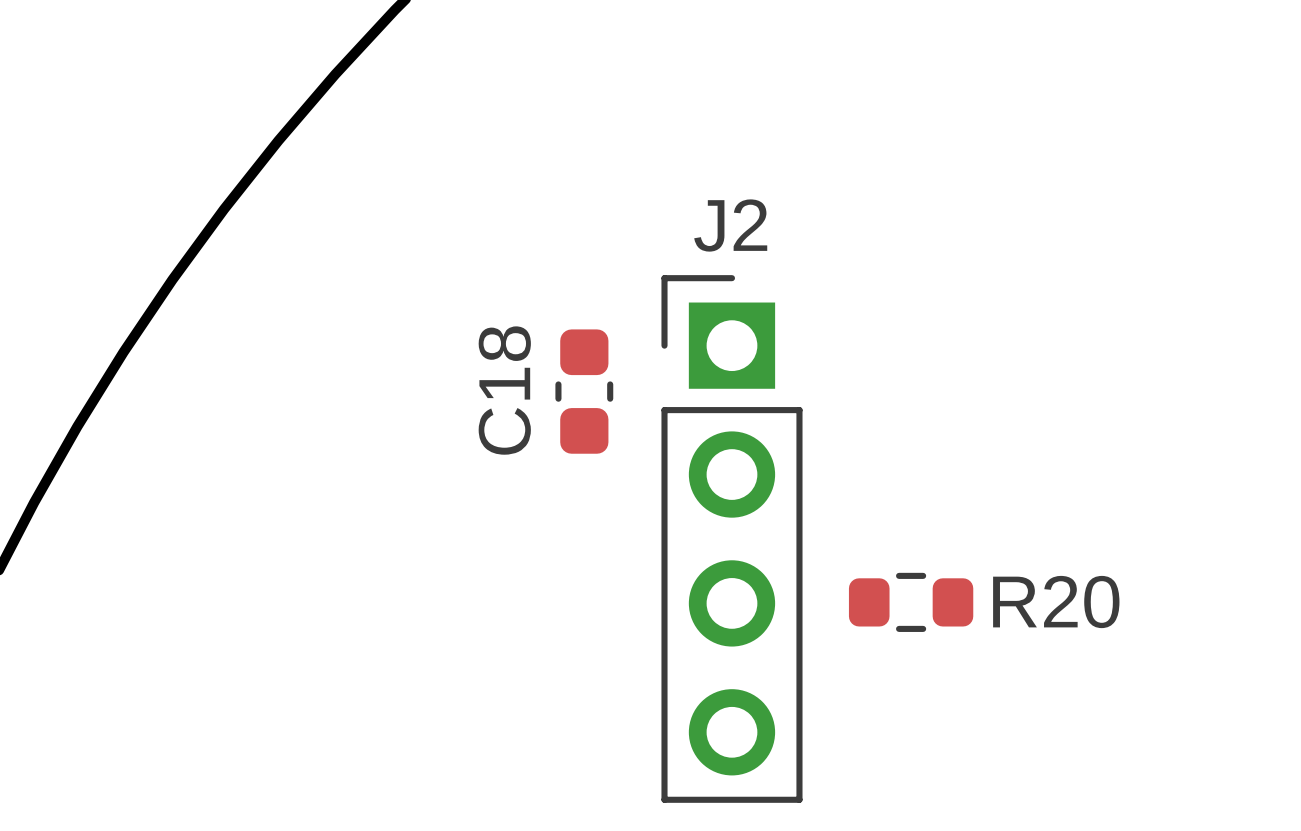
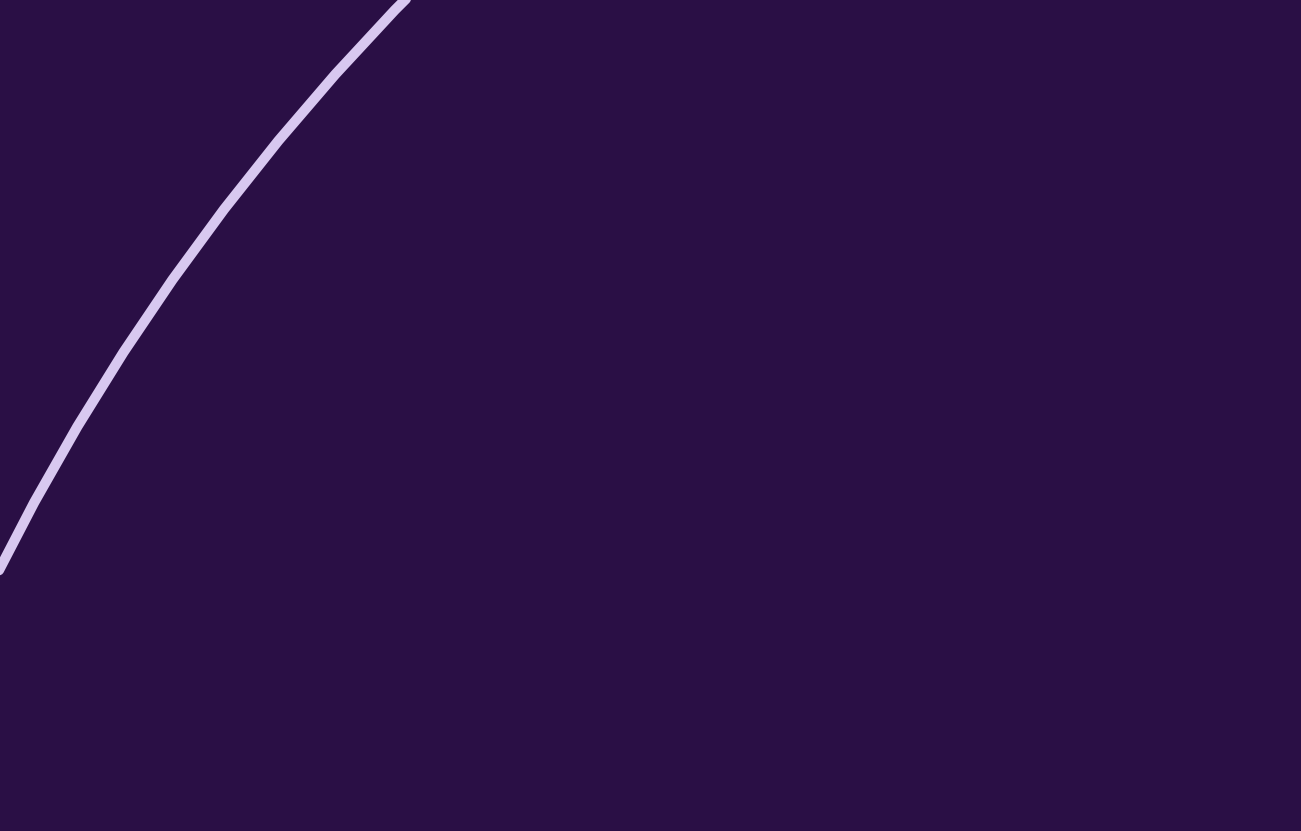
C18: (584, 391) -> none
J2: (731, 538) -> none
R20: (911, 602) -> none

